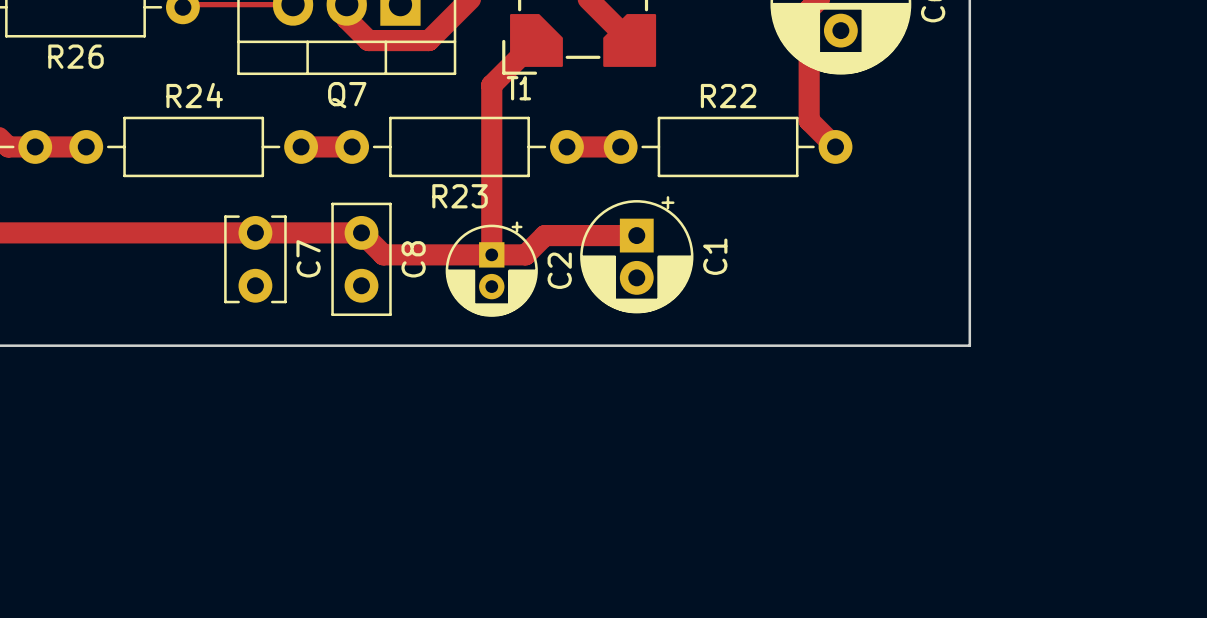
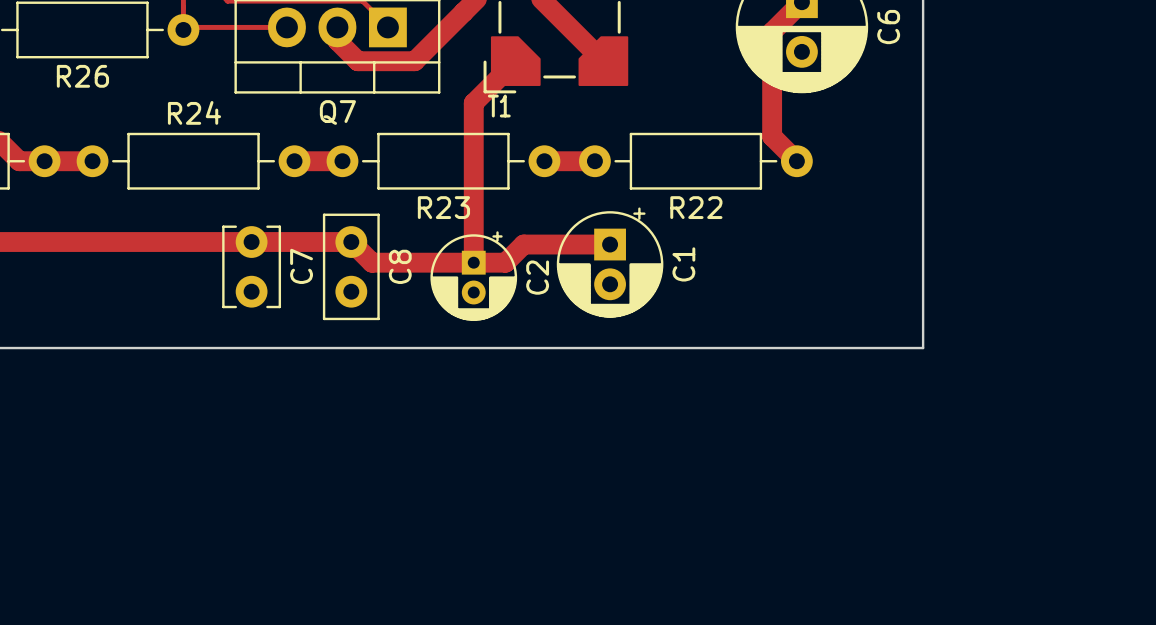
R22 name position: R22 (728, 96) -> R22 (696, 207)

